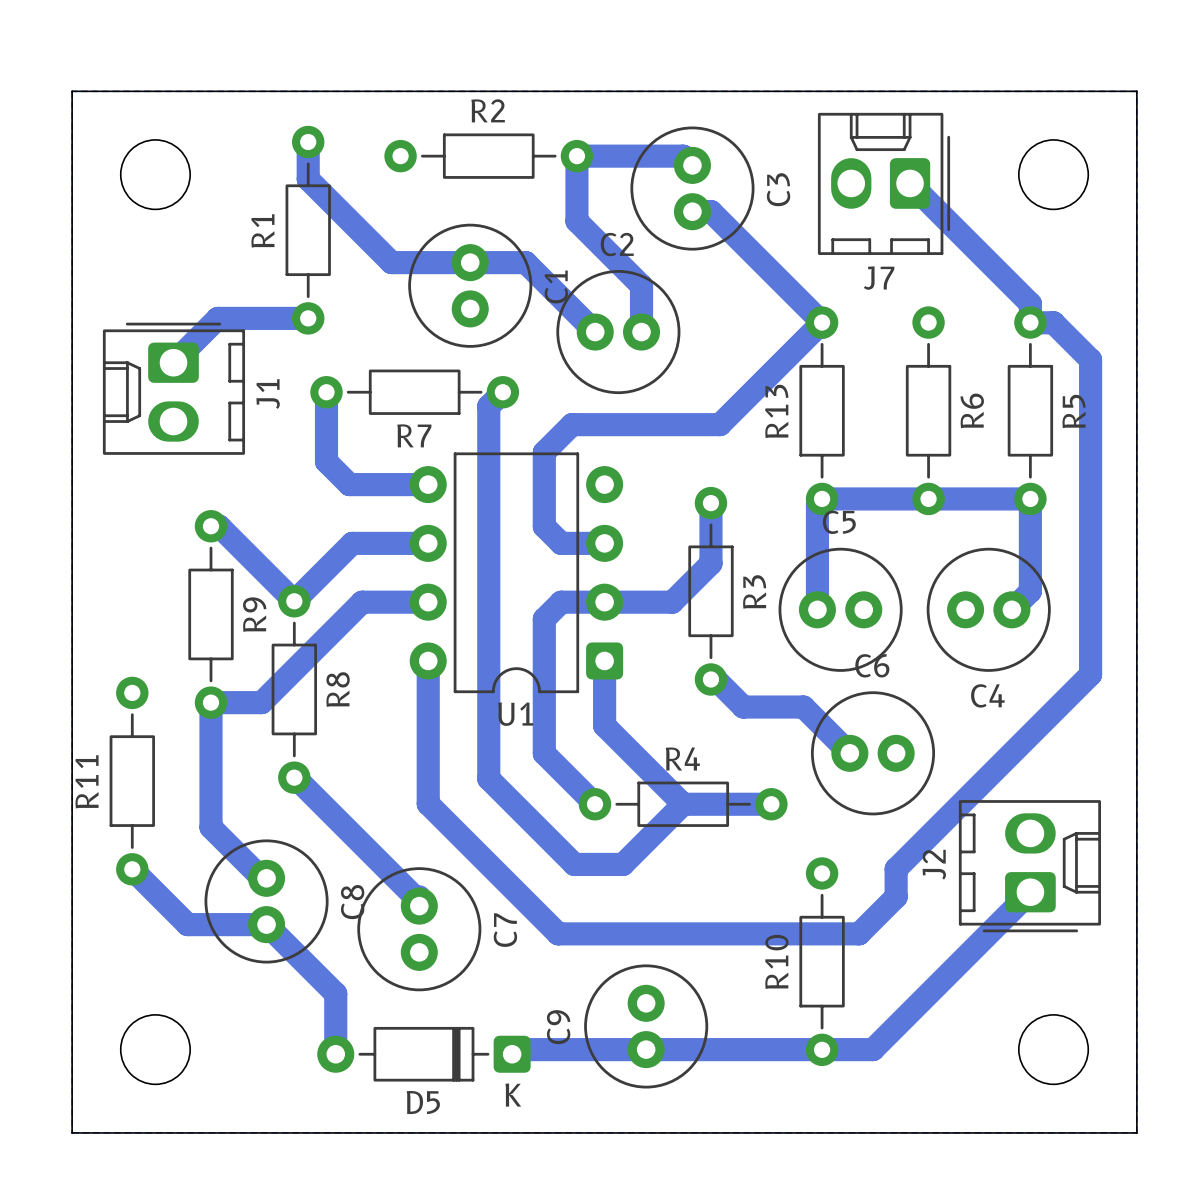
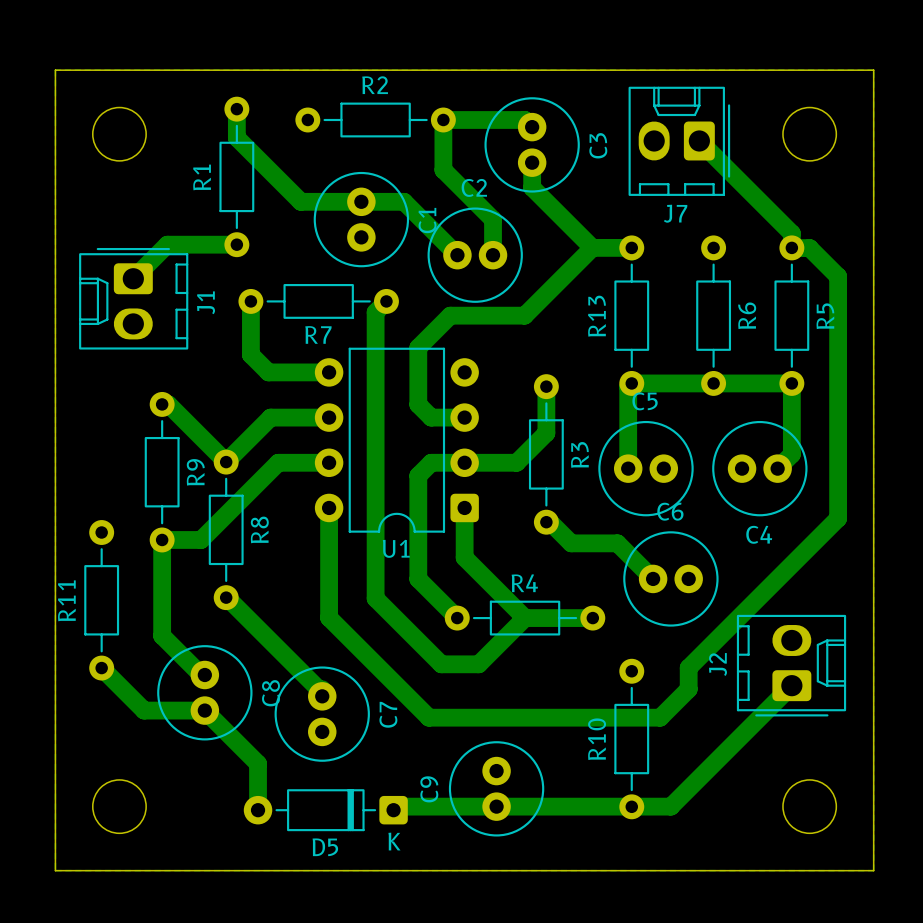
bottom track: (692, 211) (711, 211) (822, 322) (720, 424) (572, 424) -> (592, 247) (524, 315) (450, 315) (439, 326)
bottom track: none -> (532, 162) (532, 187) (592, 247)
bottom track: none -> (592, 247) (631, 247)

